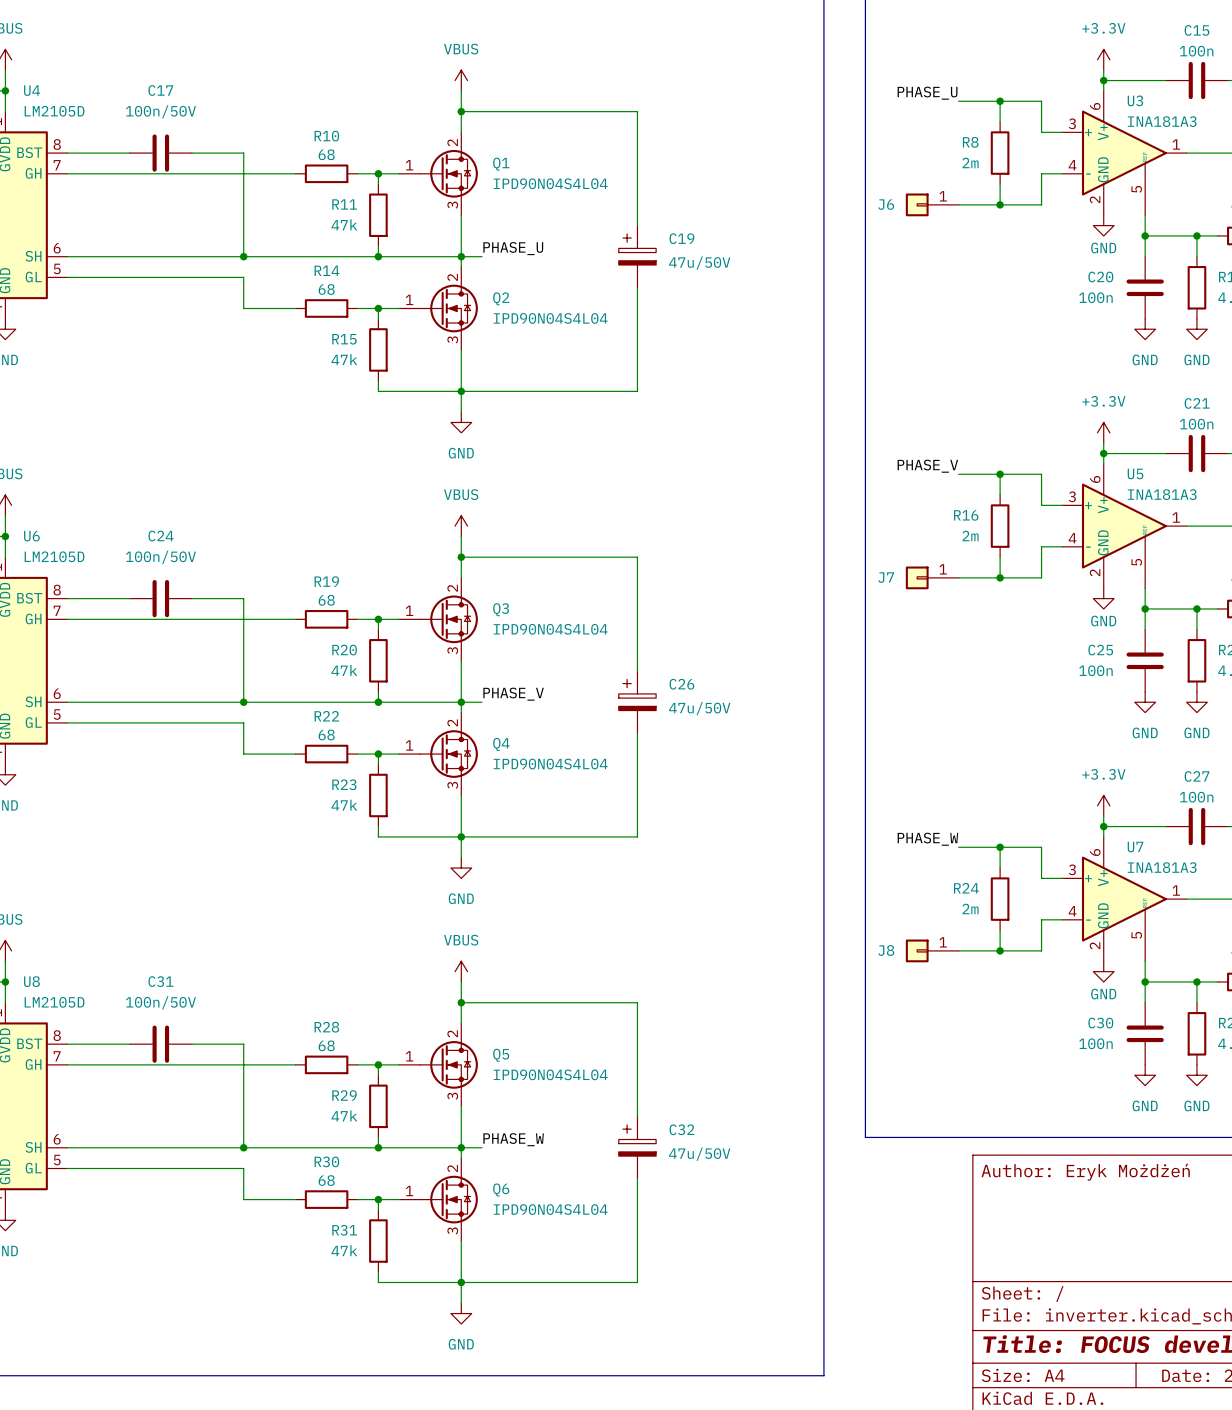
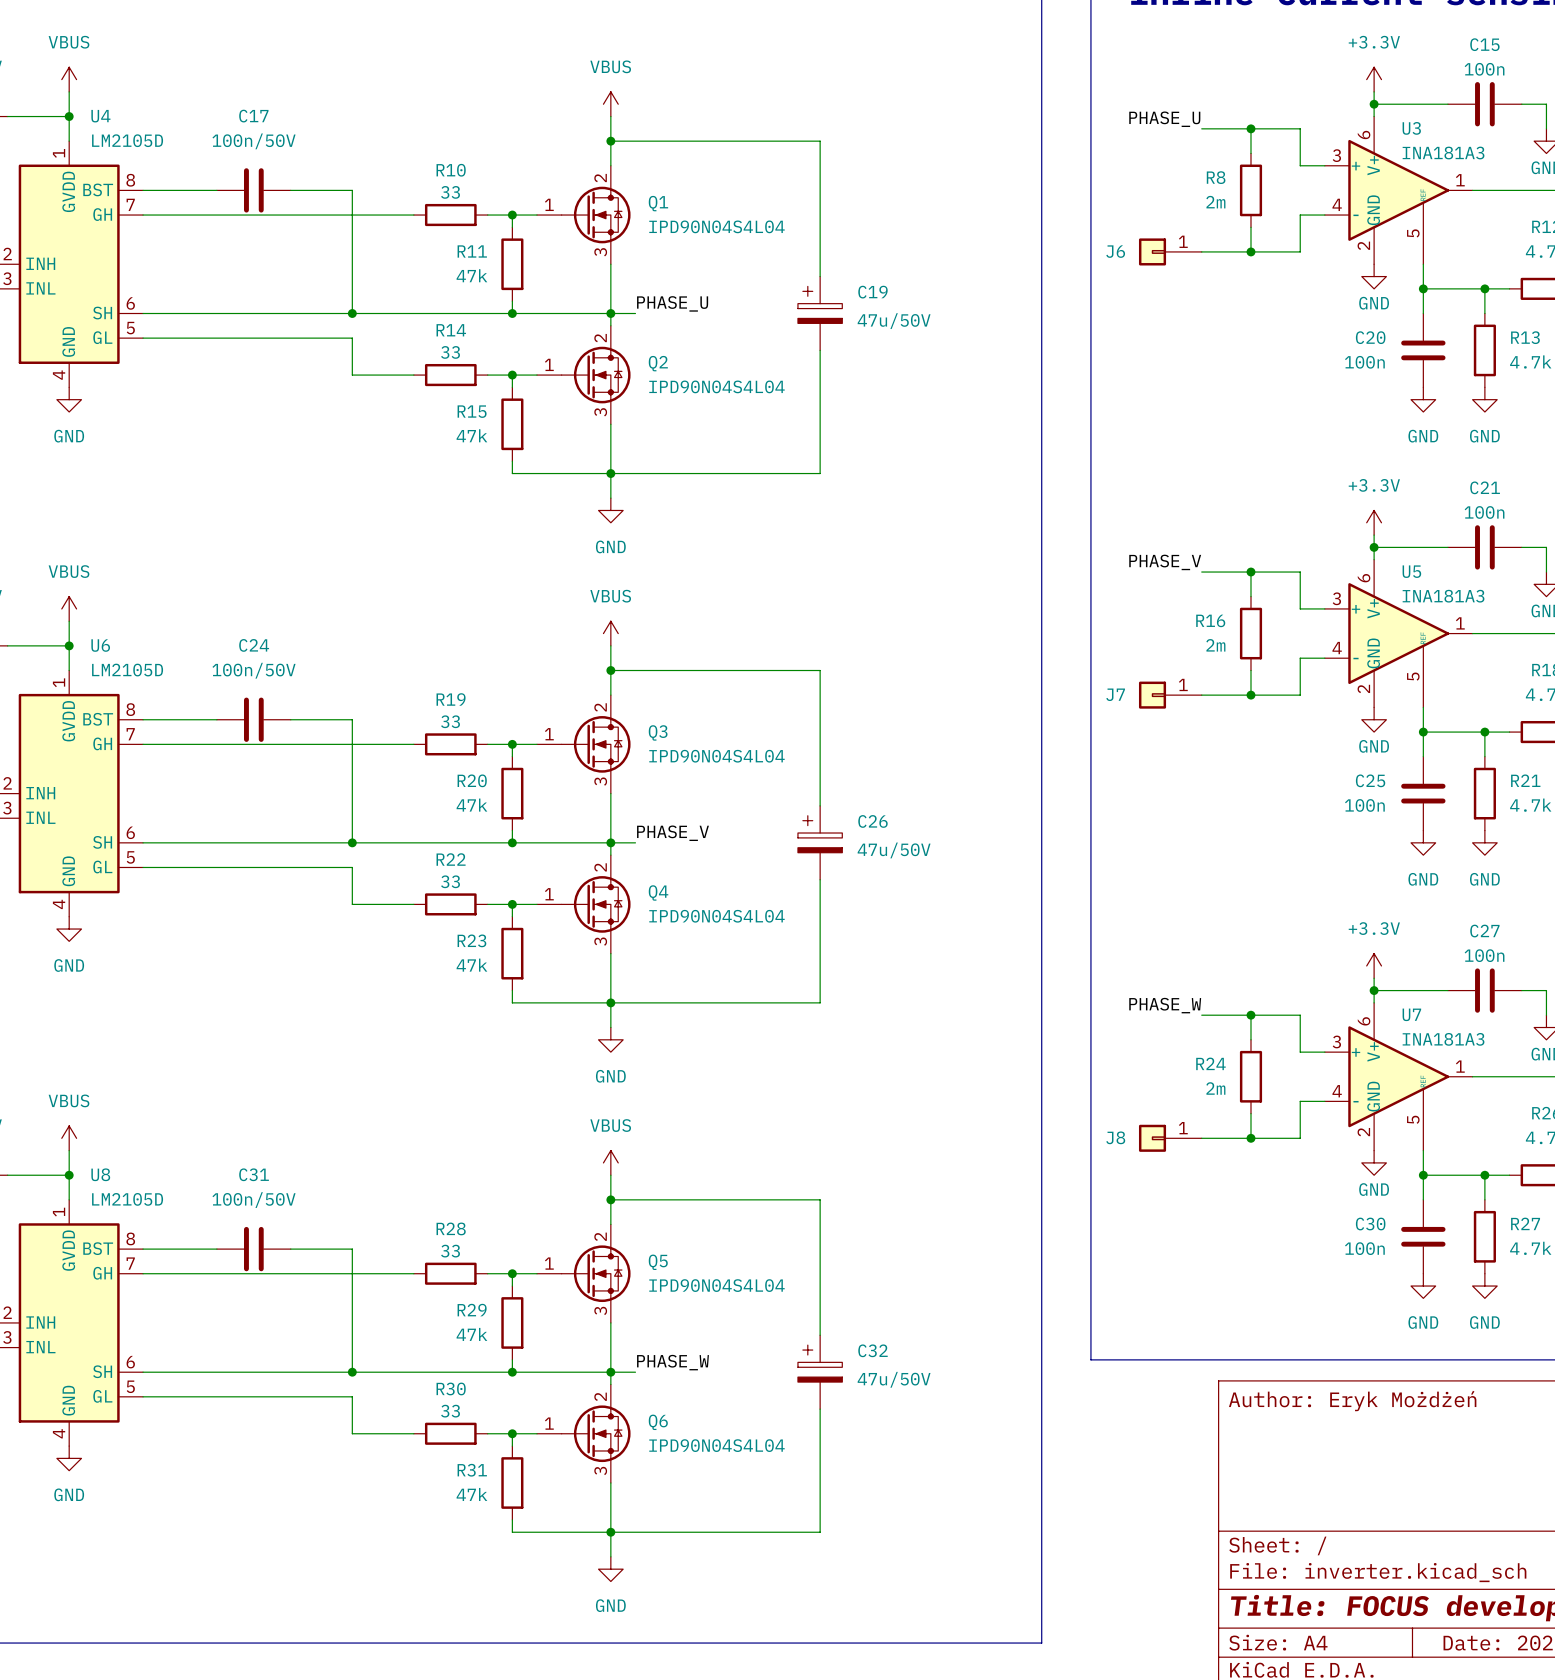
R10 value: 68 (326, 154) -> 33 (450, 192)
R14 value: 68 (326, 289) -> 33 (450, 352)
R19 value: 68 (326, 600) -> 33 (450, 721)
R22 value: 68 (326, 735) -> 33 (450, 881)
R28 value: 68 (326, 1045) -> 33 (450, 1251)
R30 value: 68 (326, 1180) -> 33 (450, 1411)

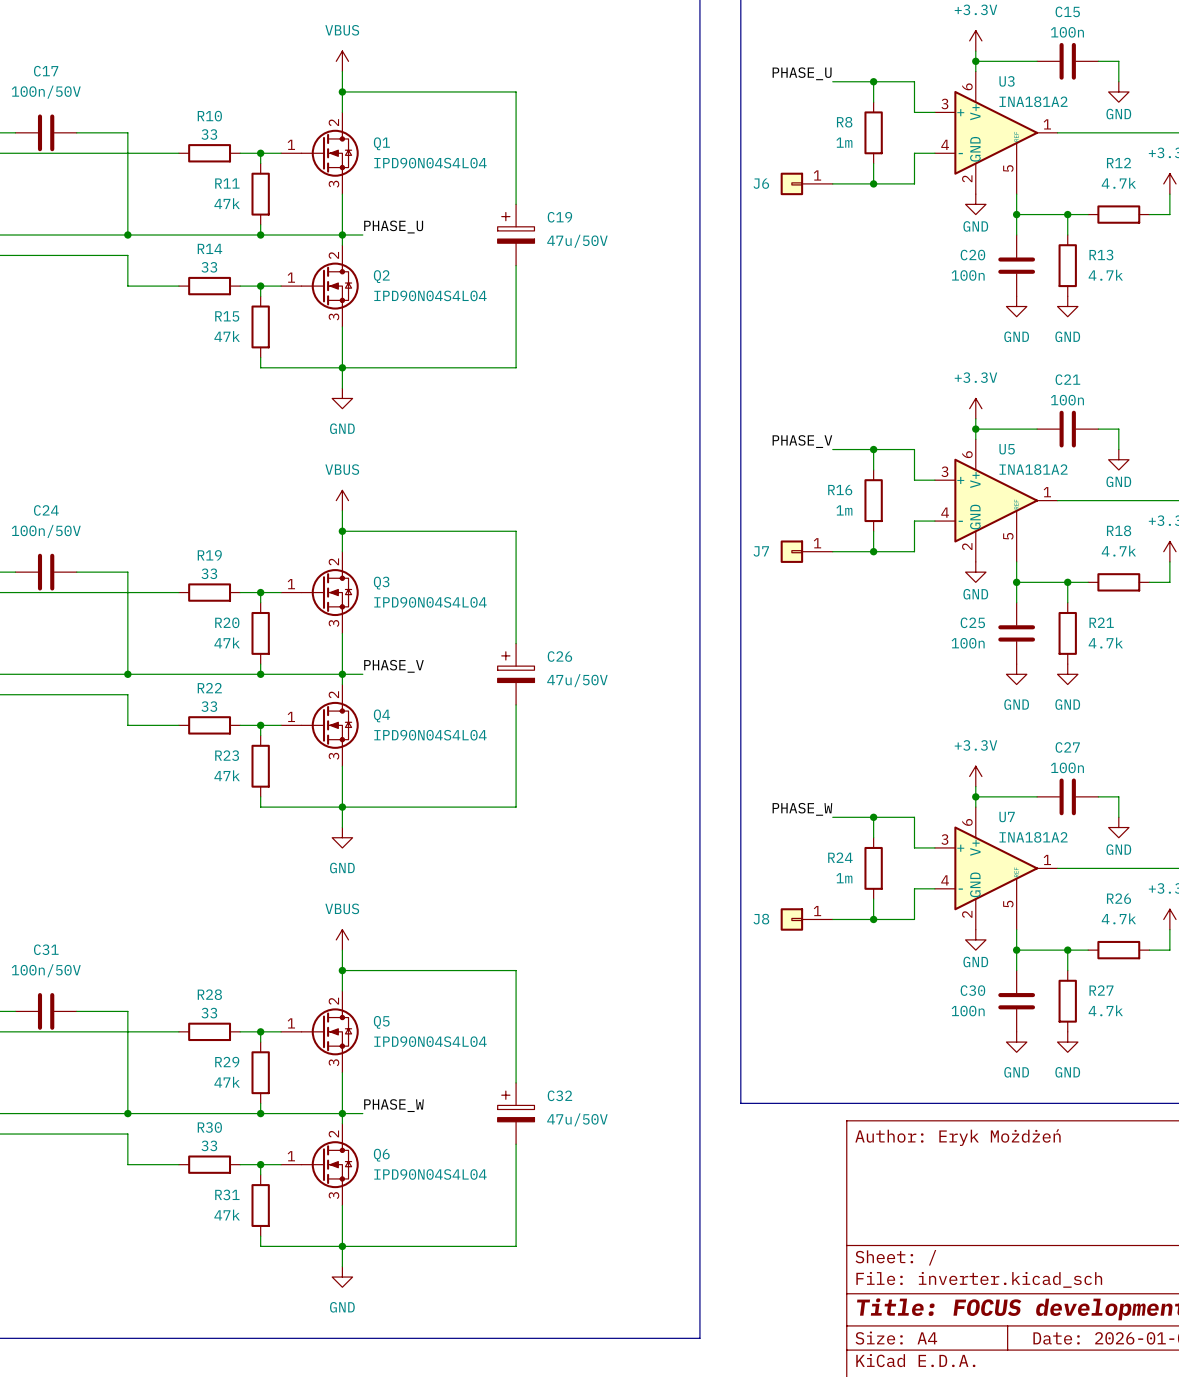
U3 value: INA181A3 (1443, 153) -> INA181A2 (1033, 101)
R8 value: 2m (1215, 202) -> 1m (844, 142)
U5 value: INA181A3 (1443, 596) -> INA181A2 (1033, 469)
R16 value: 2m (1215, 645) -> 1m (844, 510)
U7 value: INA181A3 (1443, 1039) -> INA181A2 (1033, 837)
R24 value: 2m (1215, 1088) -> 1m (844, 878)

